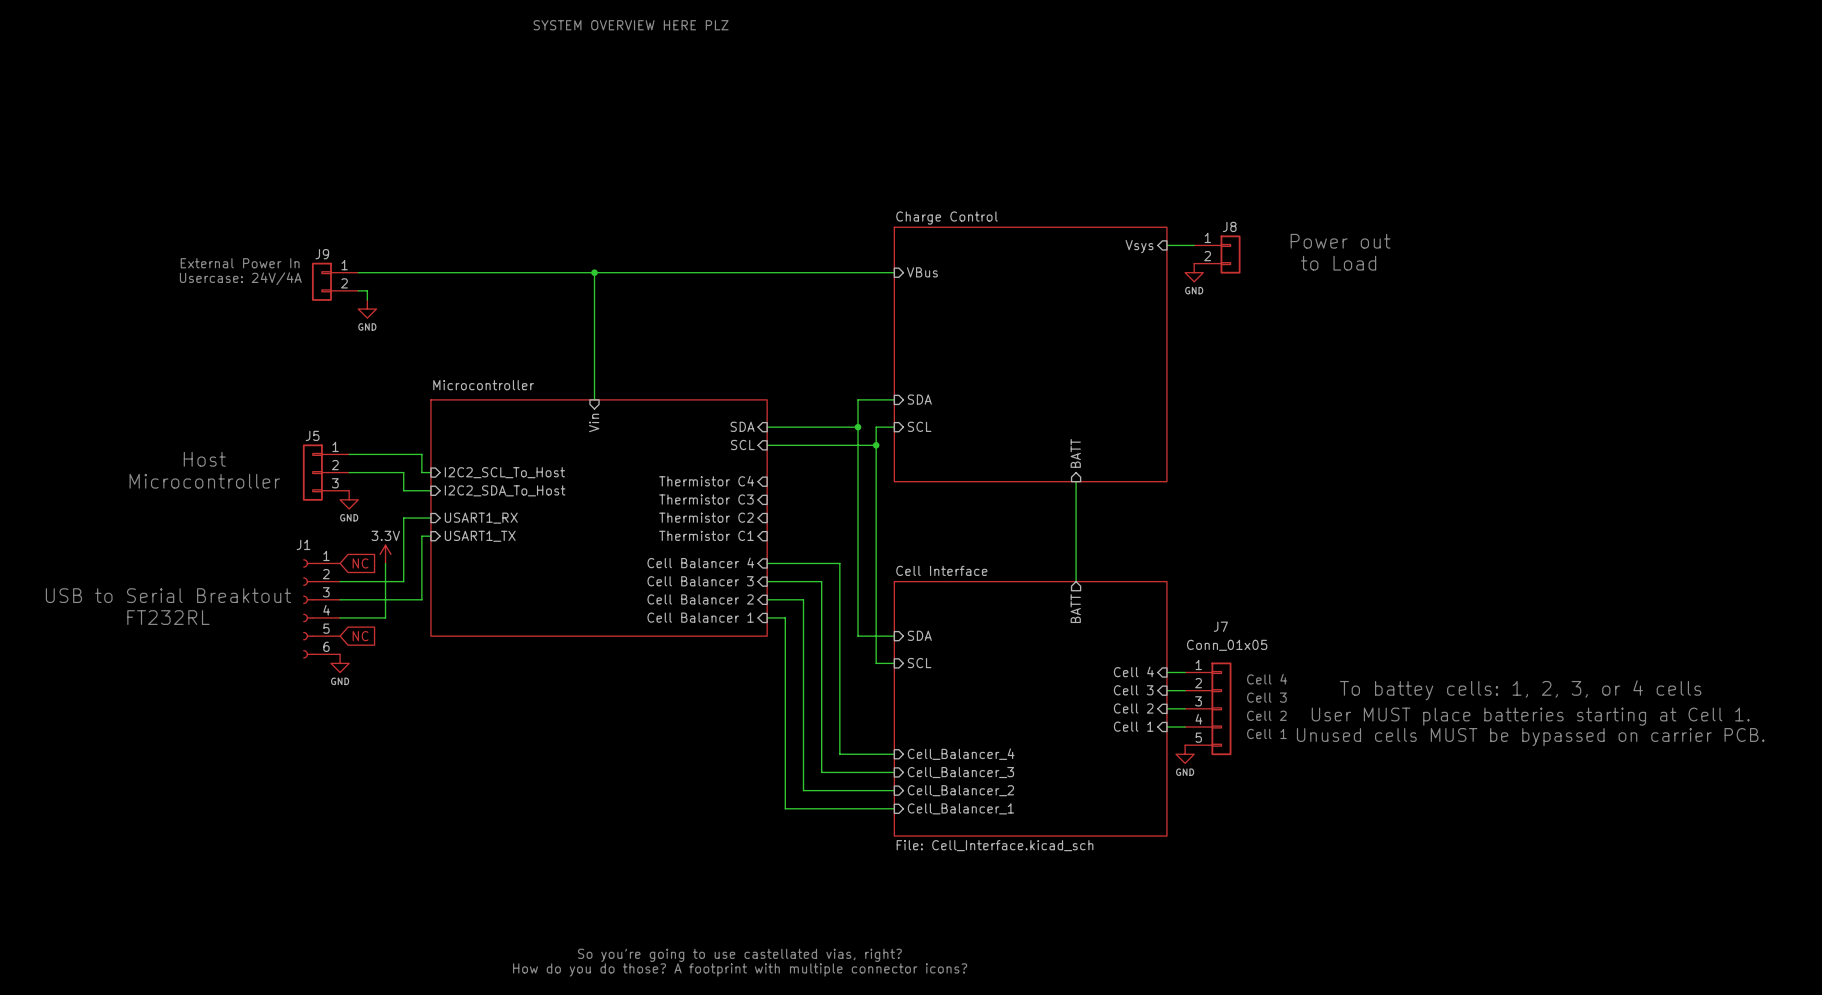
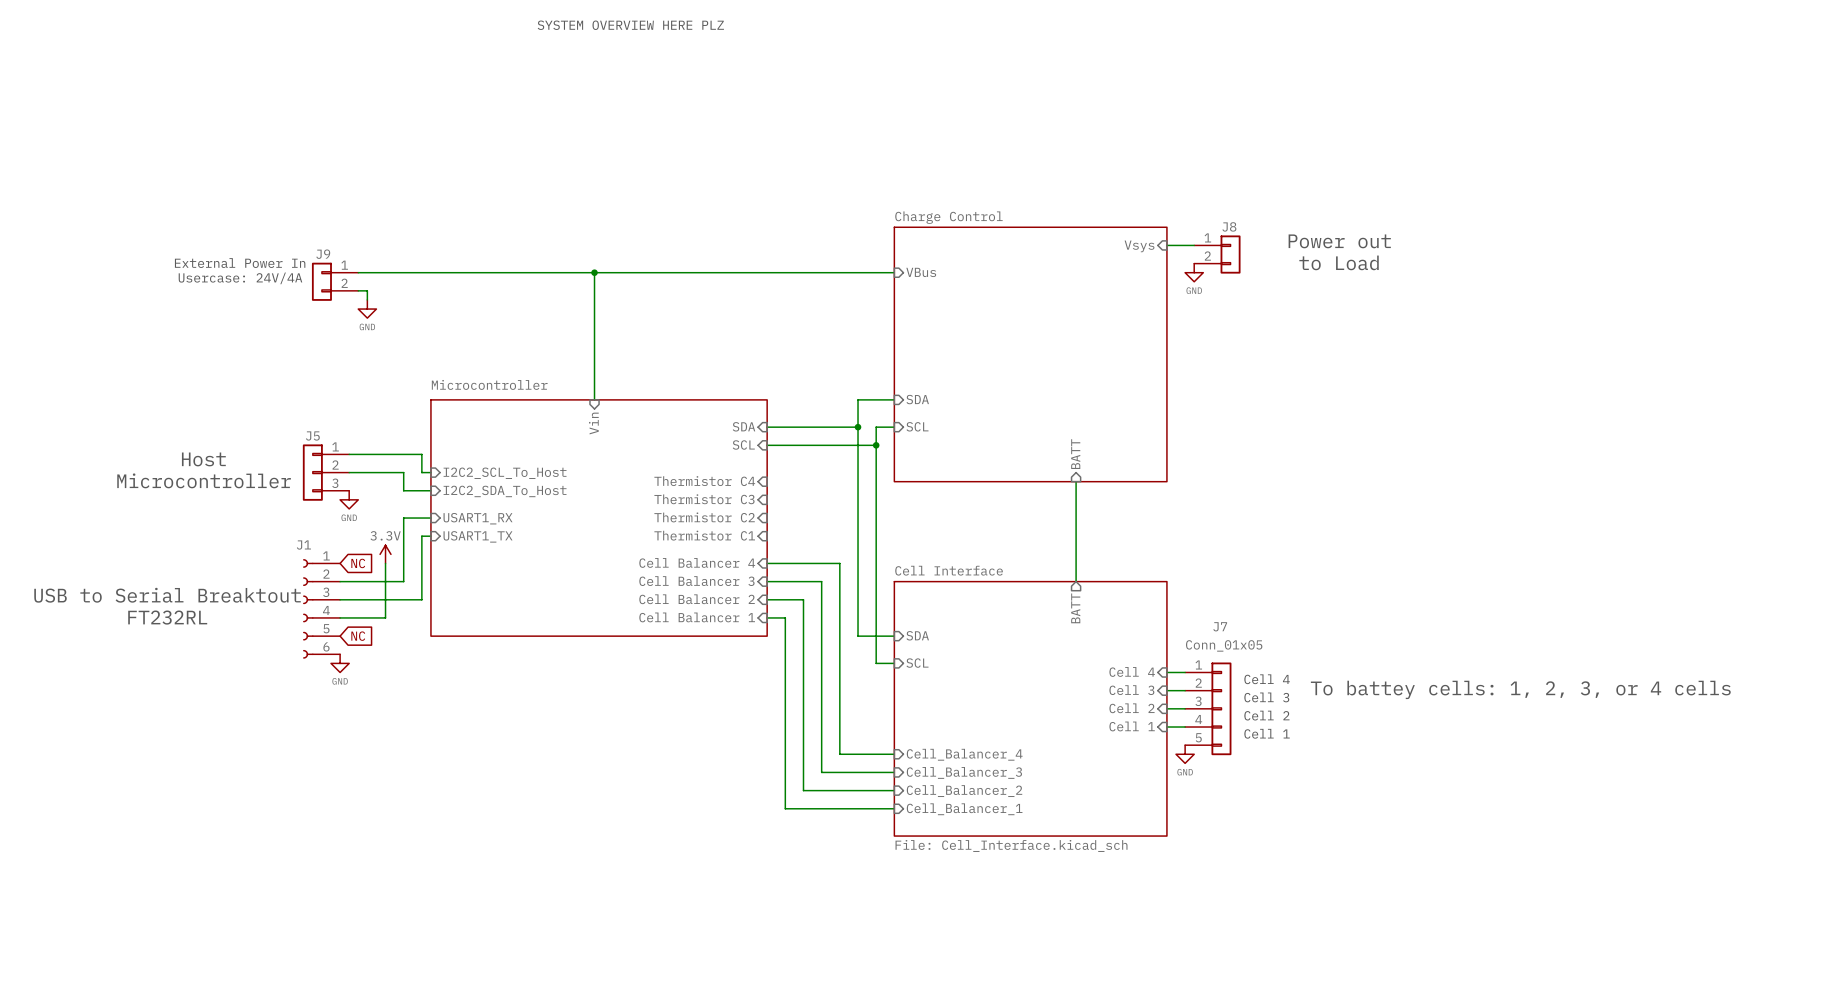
text: User MUST place batteries starting at Cell 1. (1530, 716) -> none
text: Unused cells MUST be bypassed on carrier PCB. (1530, 737) -> none
text: So you're going to use castellated vias, right? (739, 955) -> none
text: How do you do those? A footprint with multiple connector icons? (740, 969) -> none

